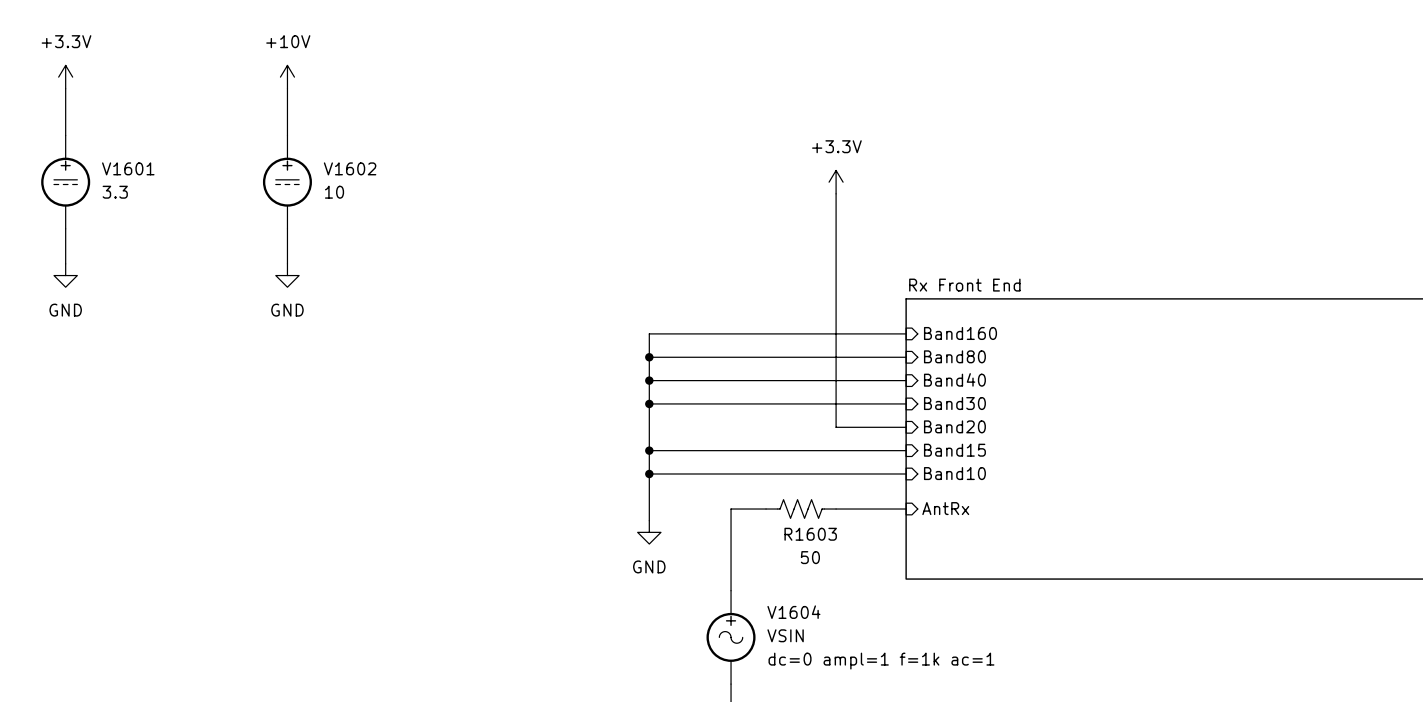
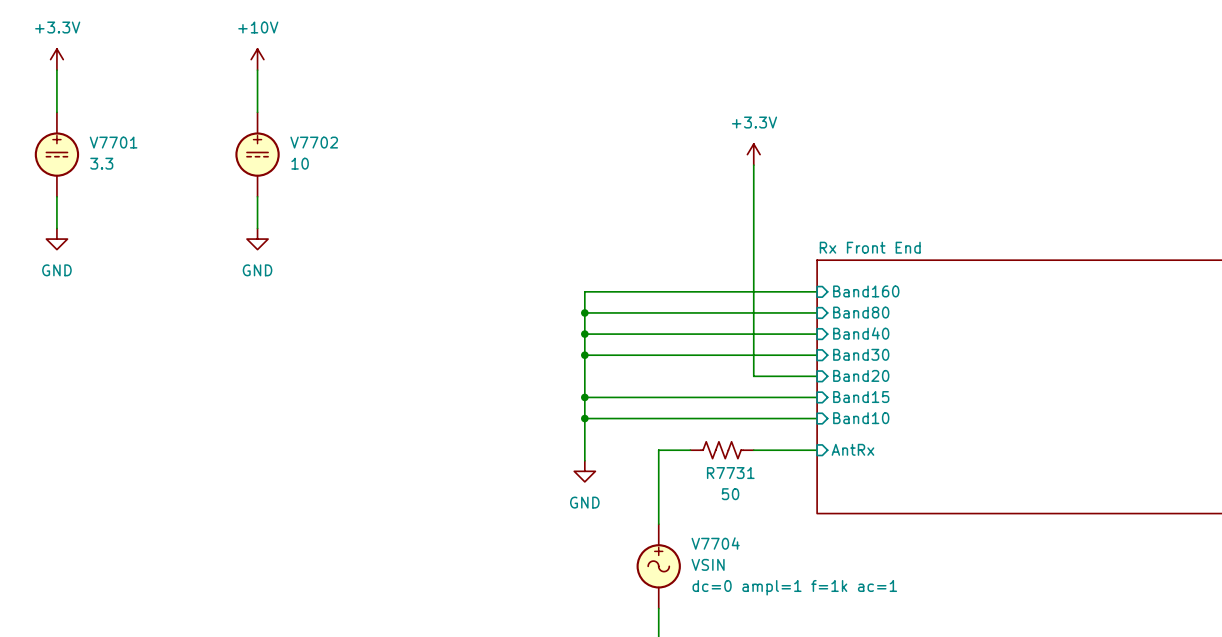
V1601 name: V1601 (128, 168) -> V7701 (113, 142)
V1602 name: V1602 (350, 168) -> V7702 (314, 142)
R1603 name: R1603 (810, 534) -> R7731 (730, 473)
V1604 name: V1604 (793, 612) -> V7704 (715, 543)

